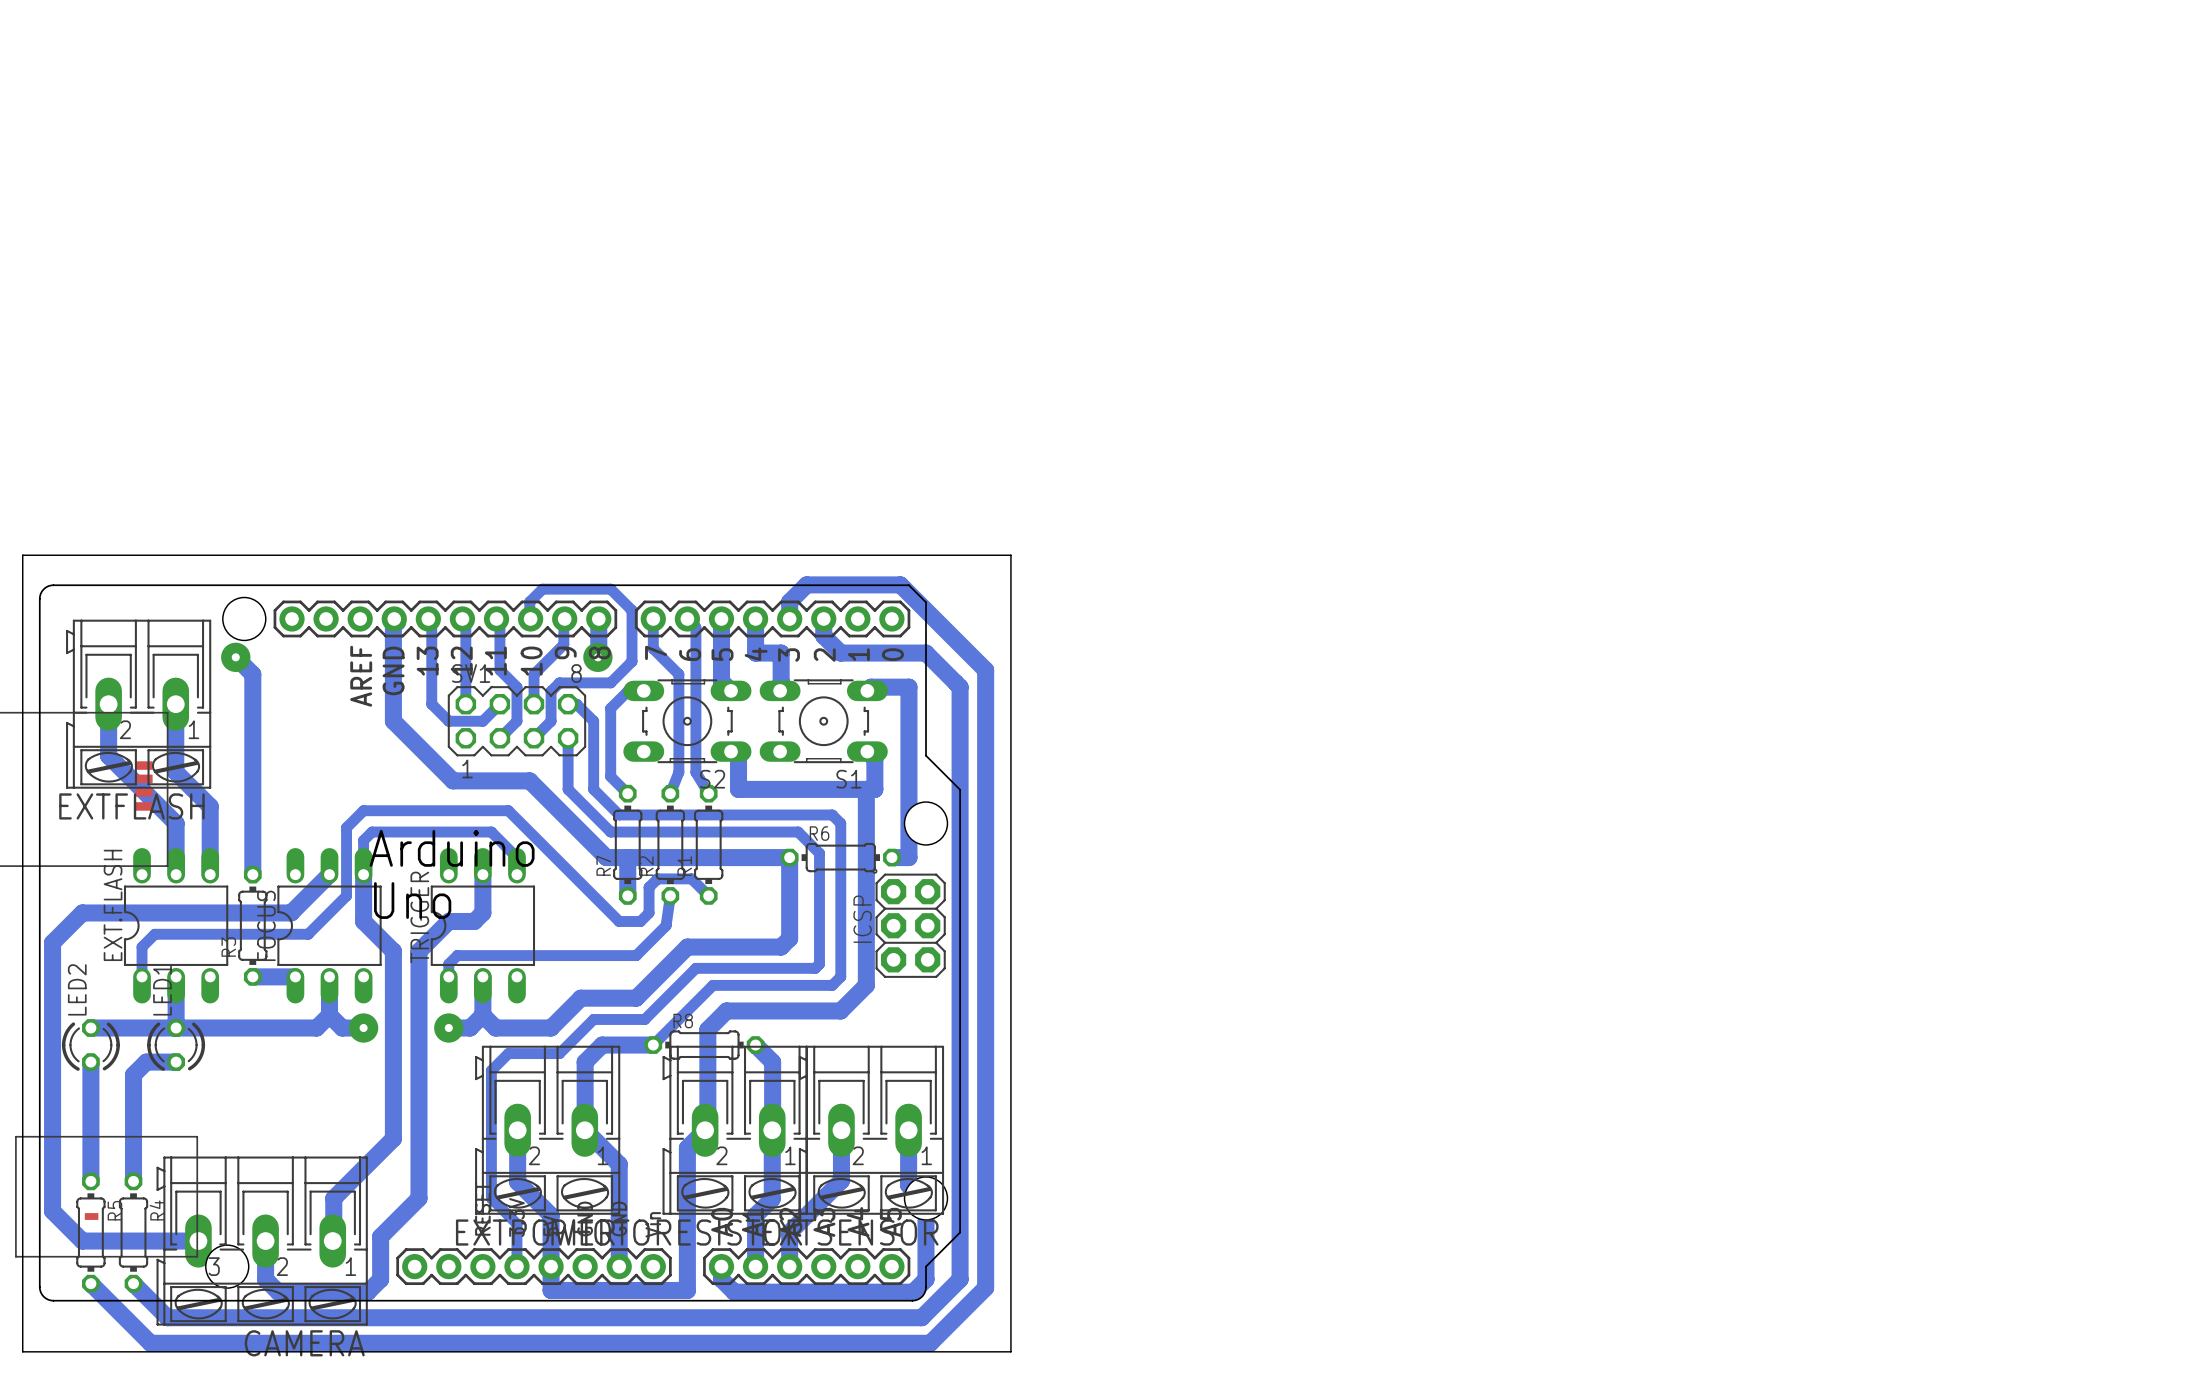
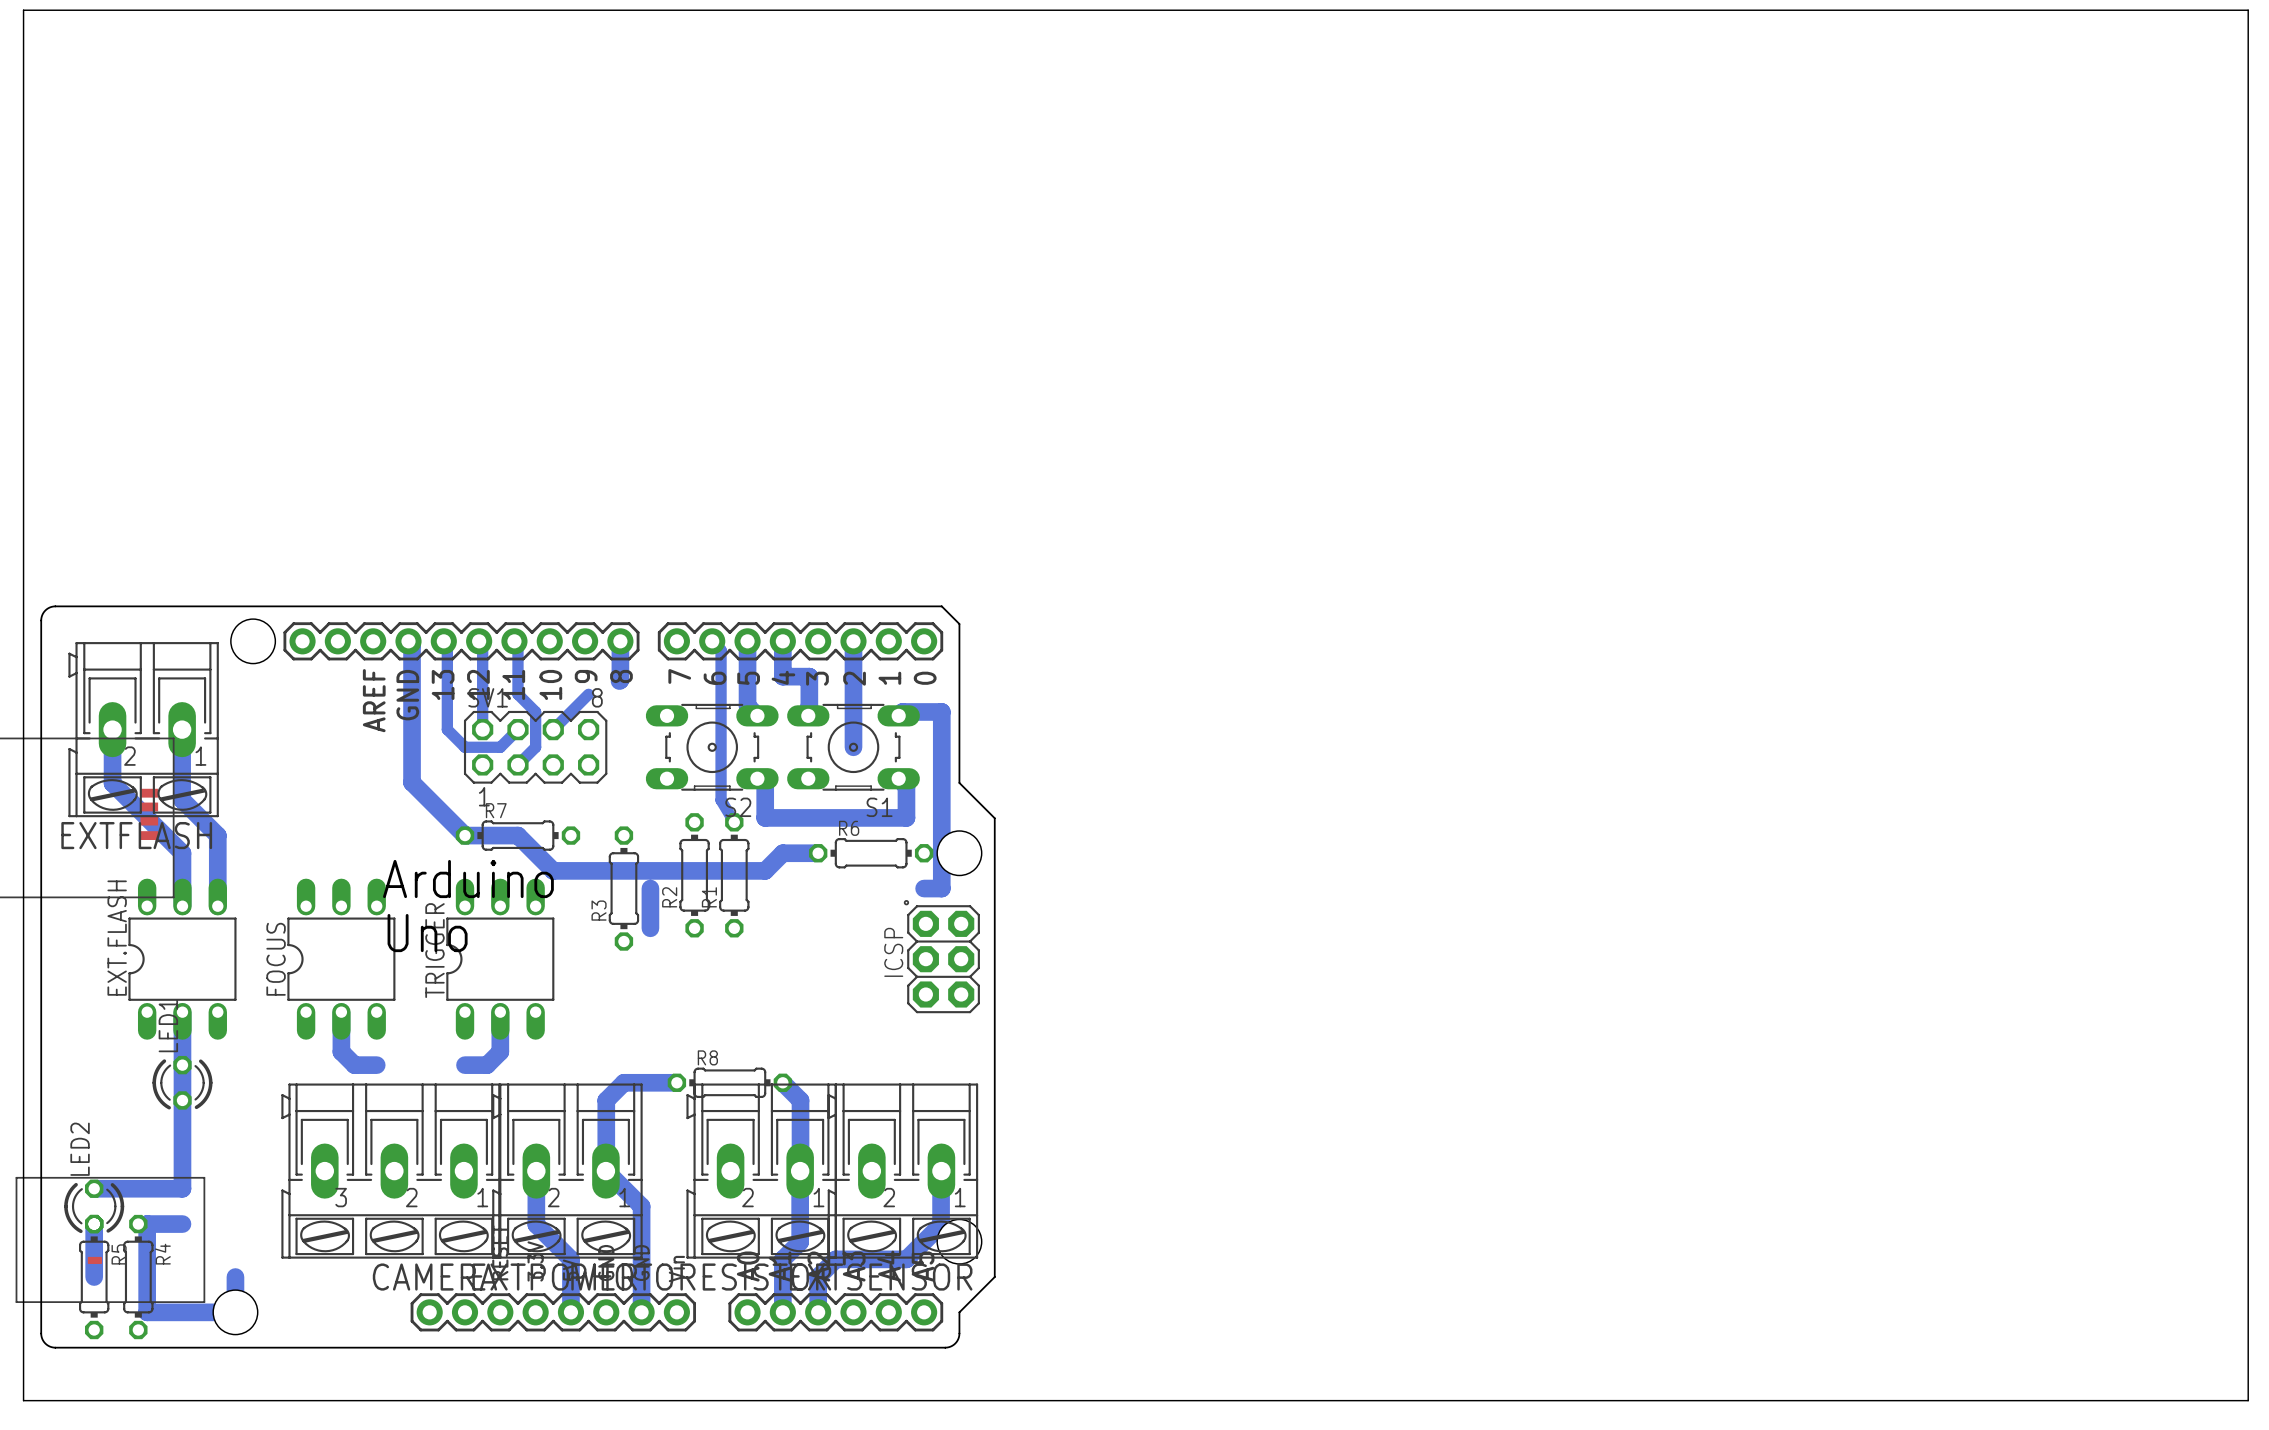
board edge: (22, 555) (1010, 555) (1010, 1351) -> (23, 575) (23, 10) (2248, 10) (2248, 1400) (1047, 1400)
bottom track: (394, 618) (393, 721) (453, 780) (529, 780) (606, 857) (789, 857) (789, 938) (781, 947) (687, 947) (636, 998) (580, 998) (551, 1028) (495, 1028) (482, 1015) -> none
bottom track: (530, 618) (529, 601) (542, 589) (610, 589) (632, 610) (632, 661) (610, 682) (559, 682) (551, 691) (551, 721) (534, 738) -> none
bottom track: (564, 618) (563, 644) (534, 674) (534, 704) -> (588, 694) (553, 729)
bottom track: (653, 618) (653, 648) (678, 674) (678, 772) (670, 793) -> none
bottom track: (789, 618) (789, 601) (806, 584) (900, 584) (985, 670) (985, 1287) (930, 1343) (150, 1343) (90, 1283) -> none
bottom track: none -> (412, 644) (412, 782) (465, 835) (517, 835) (553, 870) (765, 870) (782, 853) (818, 853)
bottom track: (823, 636) (840, 653) (926, 653) (960, 687) (960, 1279) (921, 1317) (167, 1317) (133, 1283) -> (853, 658) (853, 747)
bottom track: (235, 657) (252, 674) (252, 874) -> none
via: (235, 657) -> none
via: (597, 657) -> none
bottom track: (643, 690) (627, 691) (610, 708) (610, 776) (627, 793) -> none
bottom track: (568, 704) (576, 704) (593, 721) (593, 789) (619, 814) (832, 814) (840, 823) (840, 976) (832, 985) (712, 985) (653, 1045) -> none
bottom track: (568, 738) (568, 789) (610, 832) (798, 832) (819, 853) (819, 964) (815, 968) (695, 968) (644, 1019) (593, 1019) (559, 1053) (508, 1053) (491, 1070) (491, 1198) (516, 1224) (516, 1266) -> none
bottom track: (866, 789) (866, 985) (840, 1010) (726, 1010) (707, 1029) (707, 1127) (687, 1147) (687, 1290) (551, 1290) (551, 1266) -> none
R7 rotation: 0° (627, 844) -> 90° clockwise (517, 835)
R7 position: (627, 844) -> (517, 835)
R6 position: (840, 857) -> (871, 853)
bottom track: (329, 874) (291, 912) (82, 912) (52, 942) (52, 1211) (82, 1241) (198, 1241) -> none
bottom track: (482, 874) (482, 912) (474, 921) (448, 921) (418, 951) (418, 1198) (380, 1236) (380, 1279) (367, 1292) (278, 1292) (265, 1279) (265, 1241) -> none
bottom track: (516, 874) (516, 857) (491, 832) (372, 832) (363, 840) (363, 921) (393, 951) (393, 1138) (333, 1198) (332, 1241) -> none
bottom track: (670, 895) (666, 925) (636, 955) (457, 955) (448, 964) (448, 976) -> none
bottom track: (708, 895) (691, 878) (657, 878) (649, 887) (649, 912) (640, 921) (619, 921) (508, 810) (363, 810) (346, 827) (346, 895) (308, 934) (154, 934) (142, 947) (142, 976) -> none
R3 position: (252, 925) -> (623, 888)
bottom track: (252, 976) (295, 976) -> none
bottom track: (329, 1015) (316, 1028) (90, 1028) -> none
bottom track: none -> (182, 1065) (182, 1188) (94, 1188)
via: (363, 1028) -> none
via: (448, 1028) -> none
LED2 position: (90, 1045) -> (94, 1206)
bottom track: (90, 1062) (90, 1181) -> (94, 1277) (94, 1224)
bottom track: (176, 1062) (146, 1062) (133, 1074) (133, 1181) -> none
bottom track: (841, 1130) (841, 1180) (806, 1215) -> (941, 1171) (941, 1224) (906, 1259) (835, 1259)
bottom track: (908, 1130) (908, 1185) (926, 1202) (926, 1279) (913, 1292) (734, 1292) (721, 1279) (721, 1266) -> none
bottom track: none -> (182, 1224) (147, 1224) (147, 1312) (235, 1312) (235, 1277)
CAMERA position: (262, 1241) -> (390, 1171)

